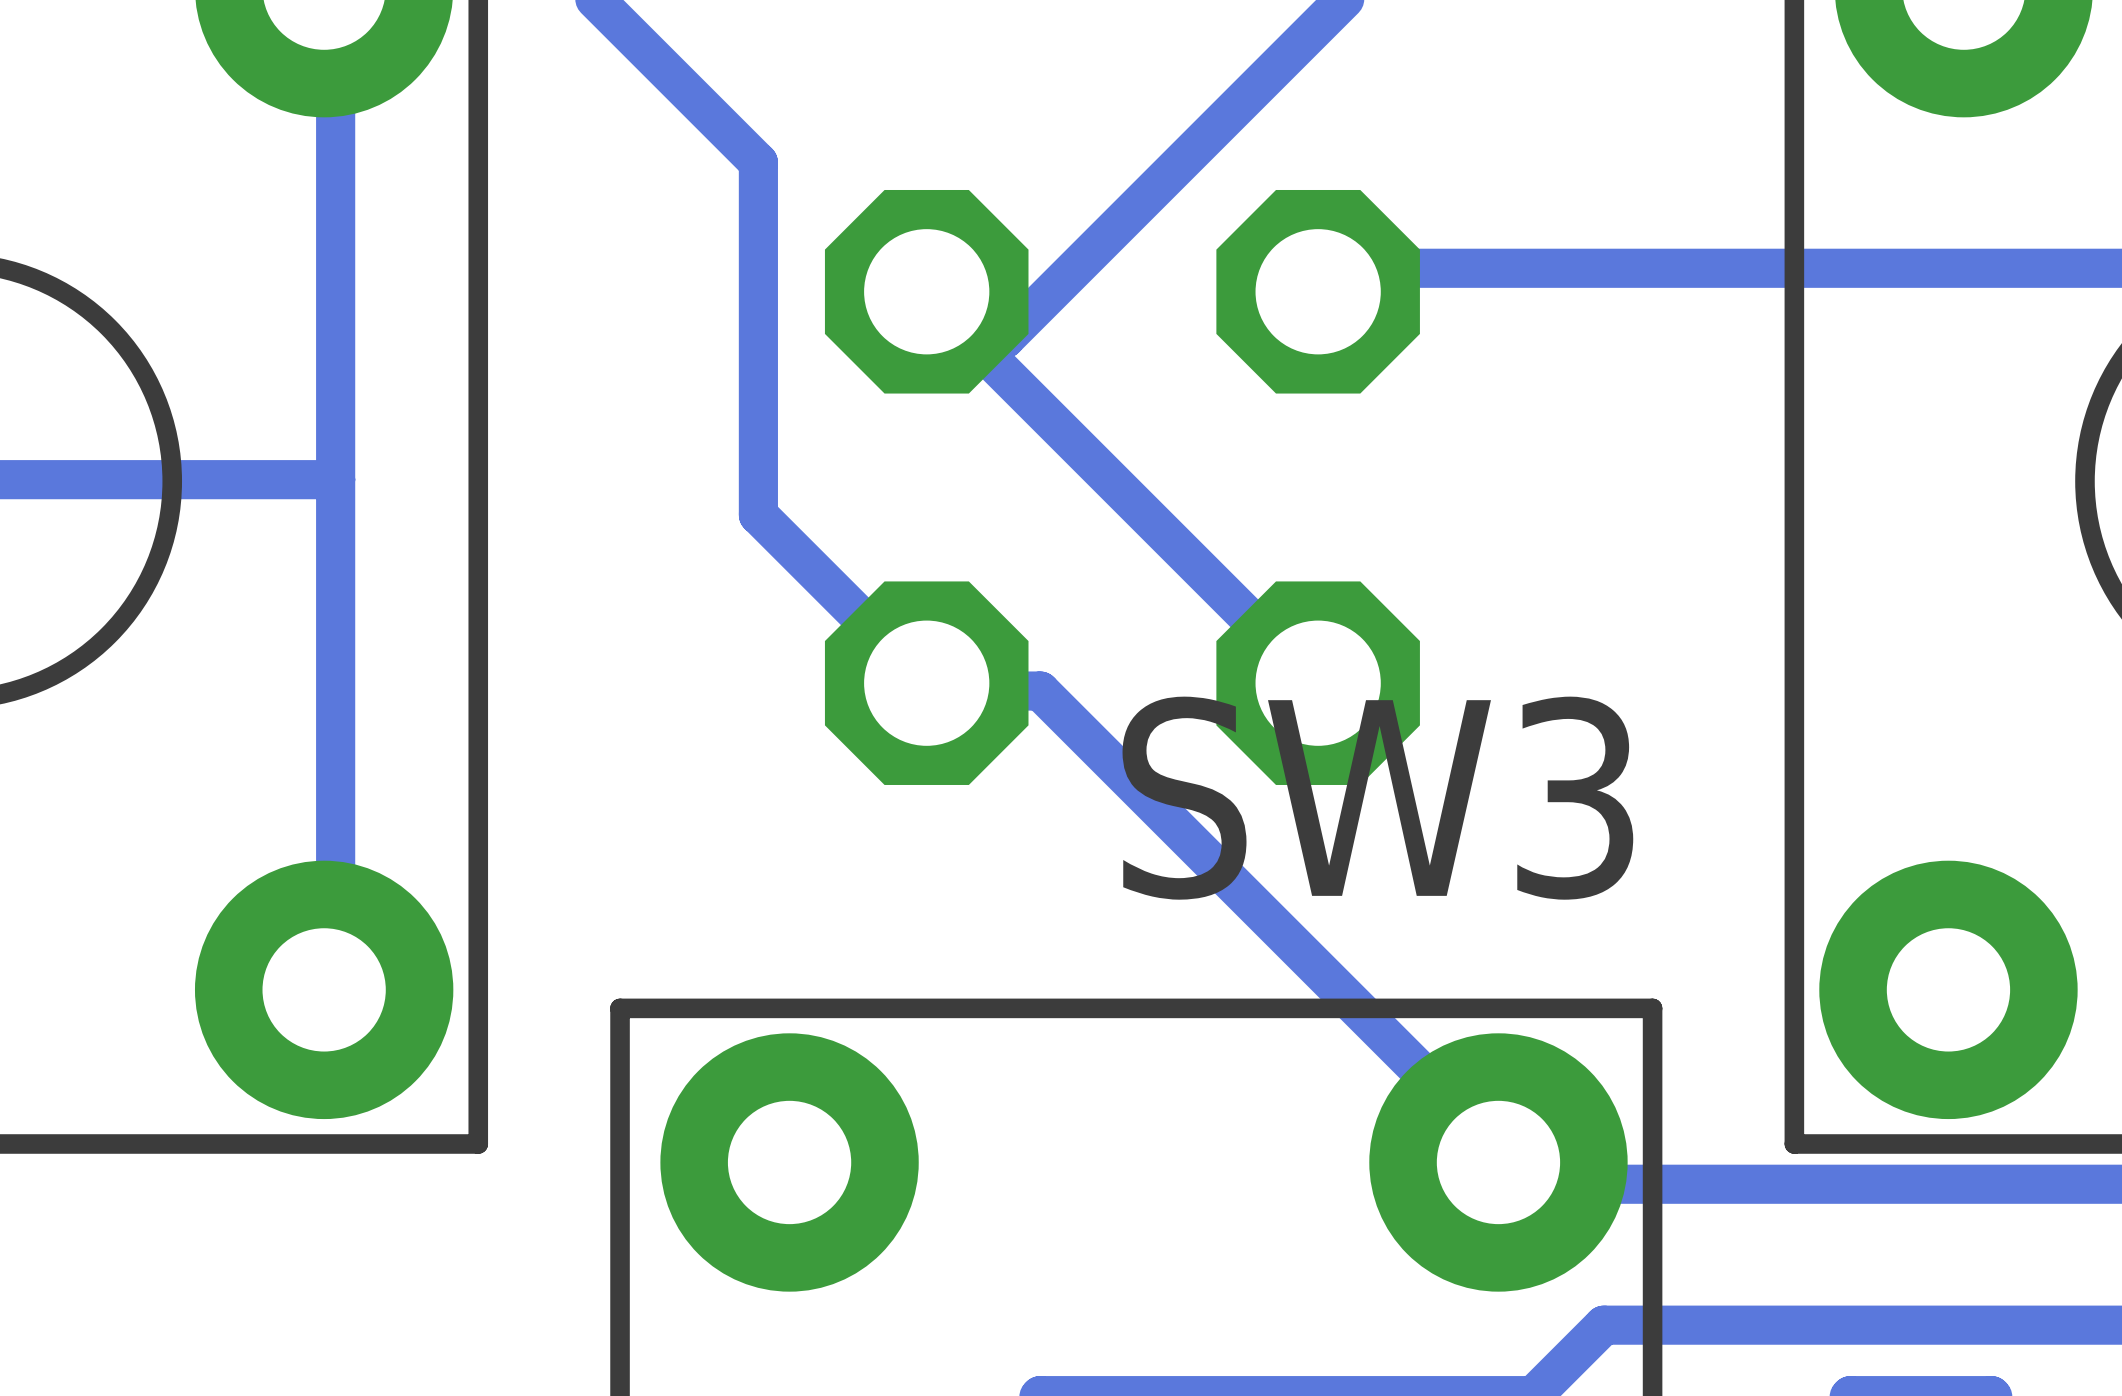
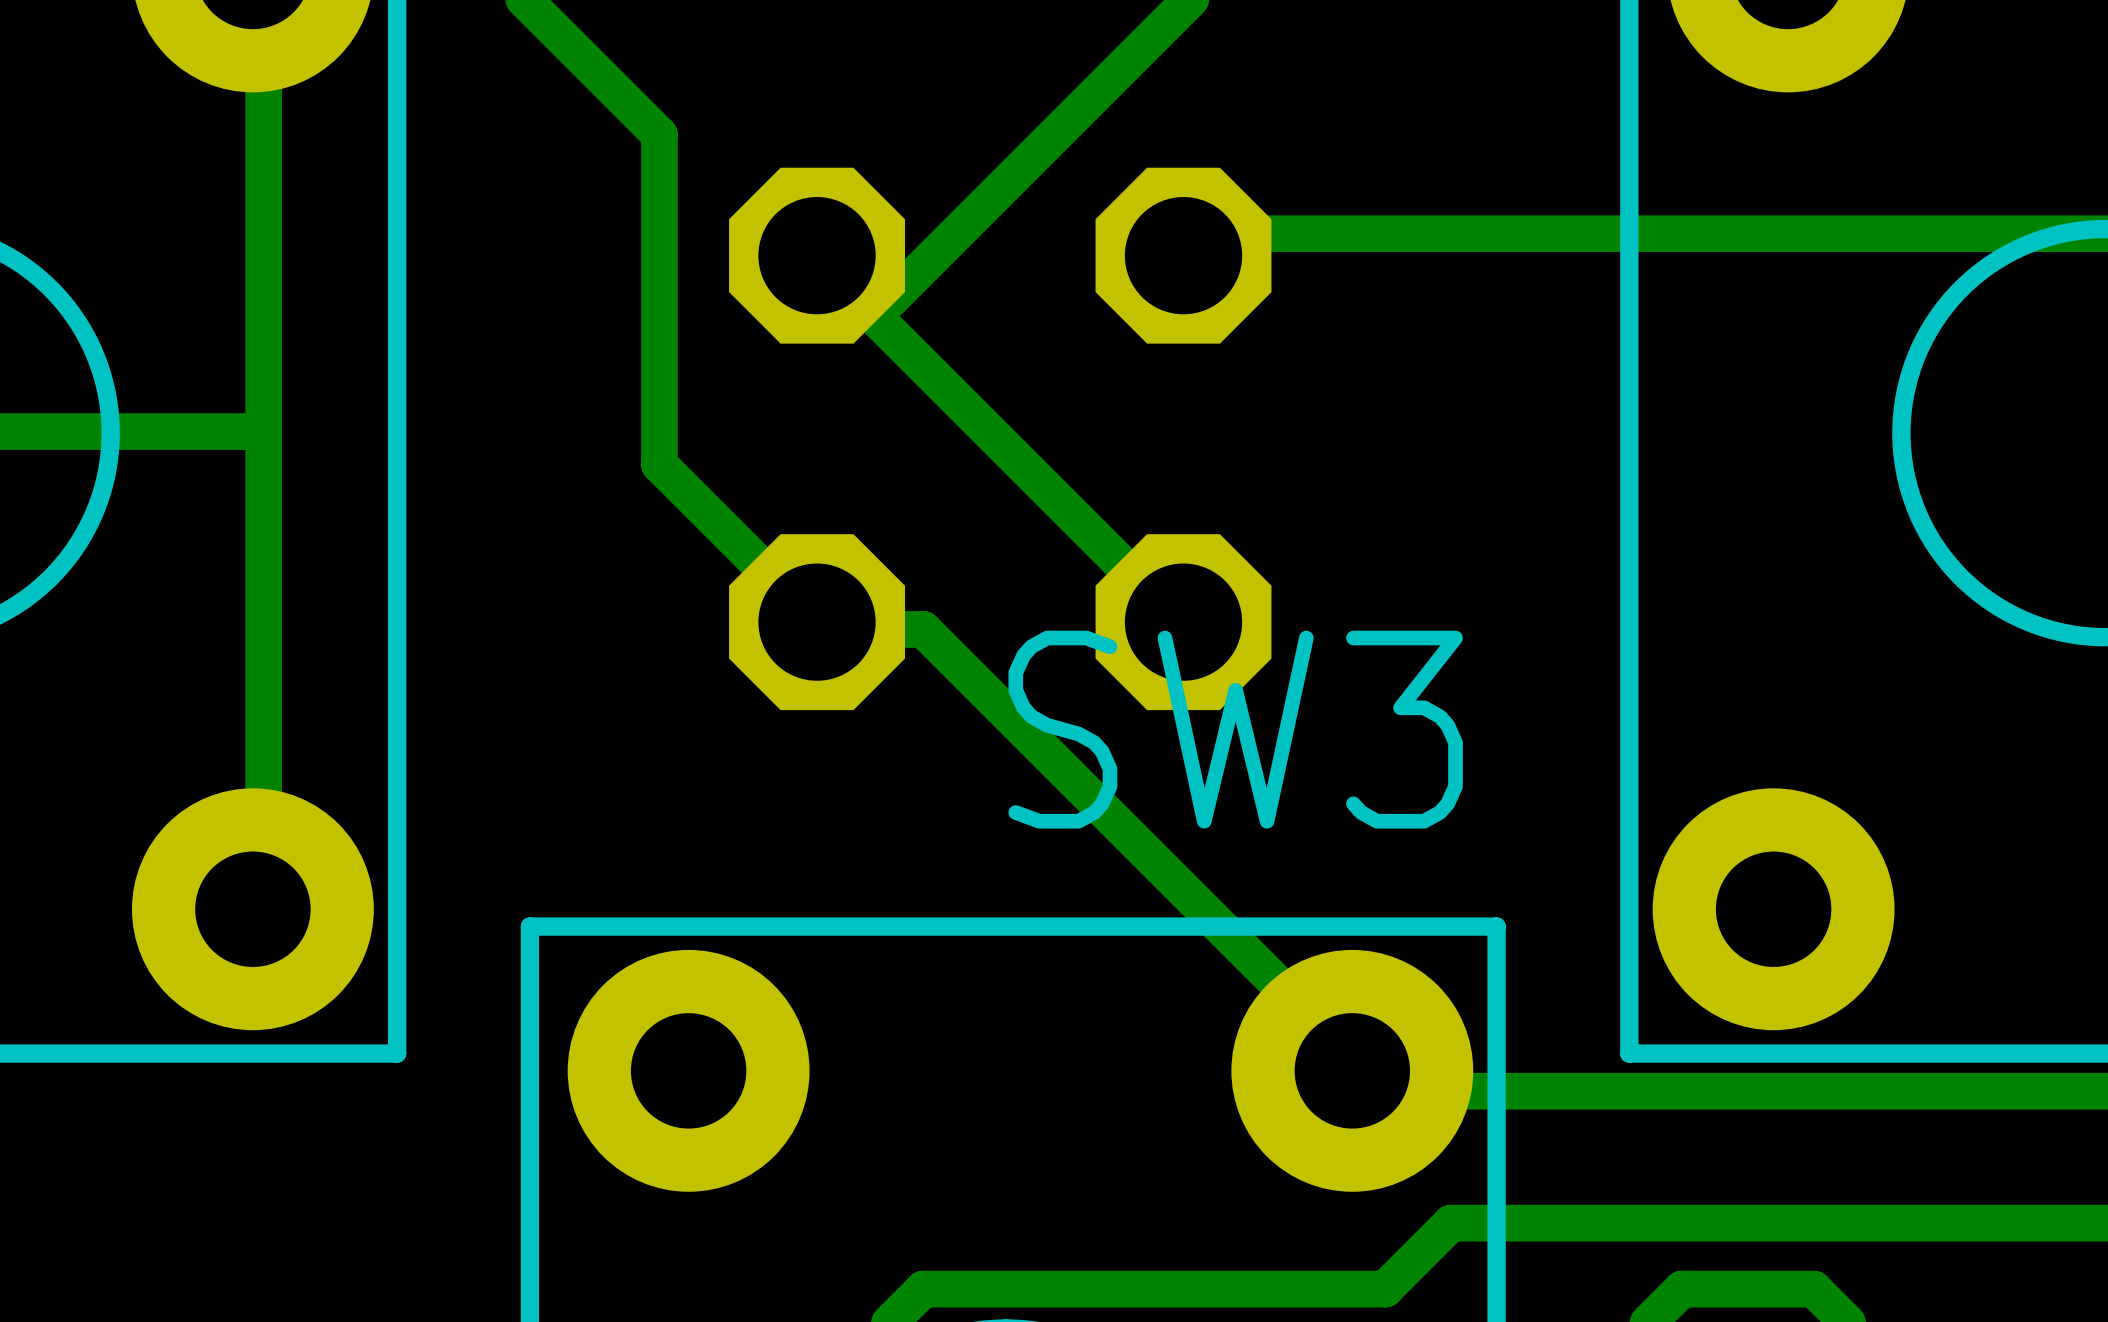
part footprint: [824, 189, 1420, 394] -> [729, 167, 1272, 344]
part footprint: [824, 581, 1420, 785] -> [729, 534, 1272, 711]

